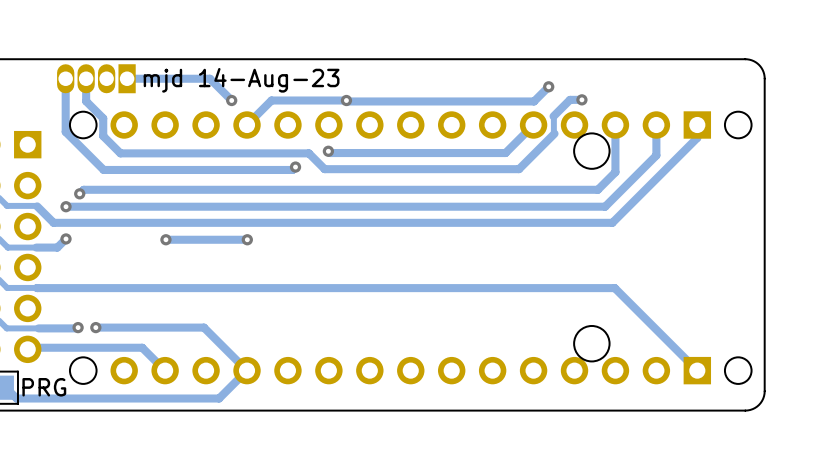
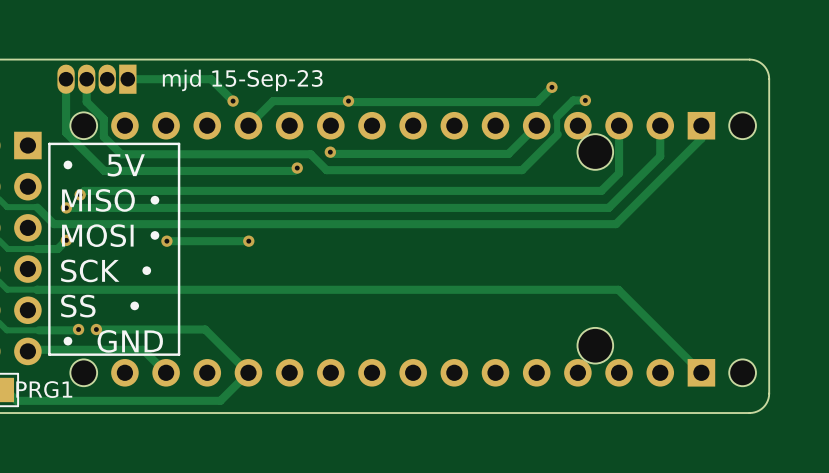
text: mjd 14-Aug-23 (241, 80) -> mjd 15-Sep-23 (242, 80)
line: none -> (179, 143) (49, 143) (49, 354) (179, 354) (179, 143)
text: none -> • 5V (104, 165)
text: none -> MISO • (110, 200)
text: none -> MOSI • (110, 235)
text: none -> SCK • (106, 270)
text: none -> SS • (100, 306)
text: none -> • GND (113, 341)
PRG name: PRG (44, 387) -> PRG1 (44, 389)

